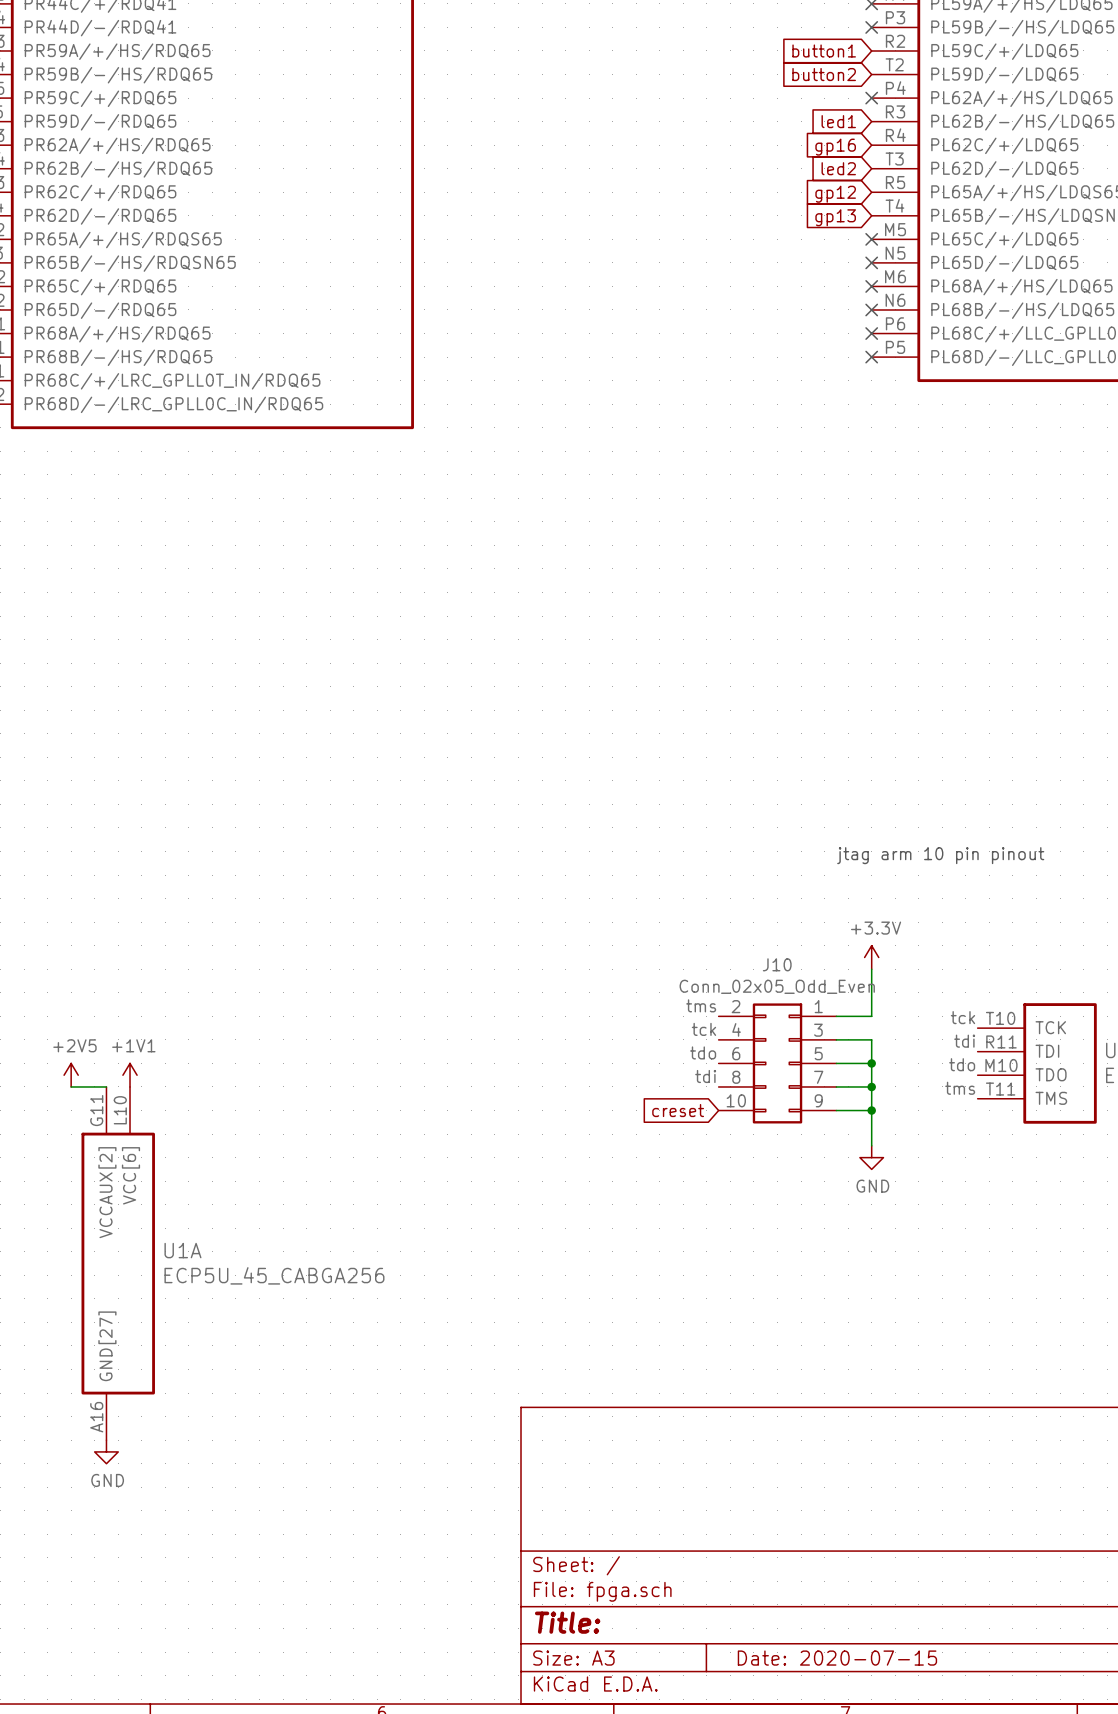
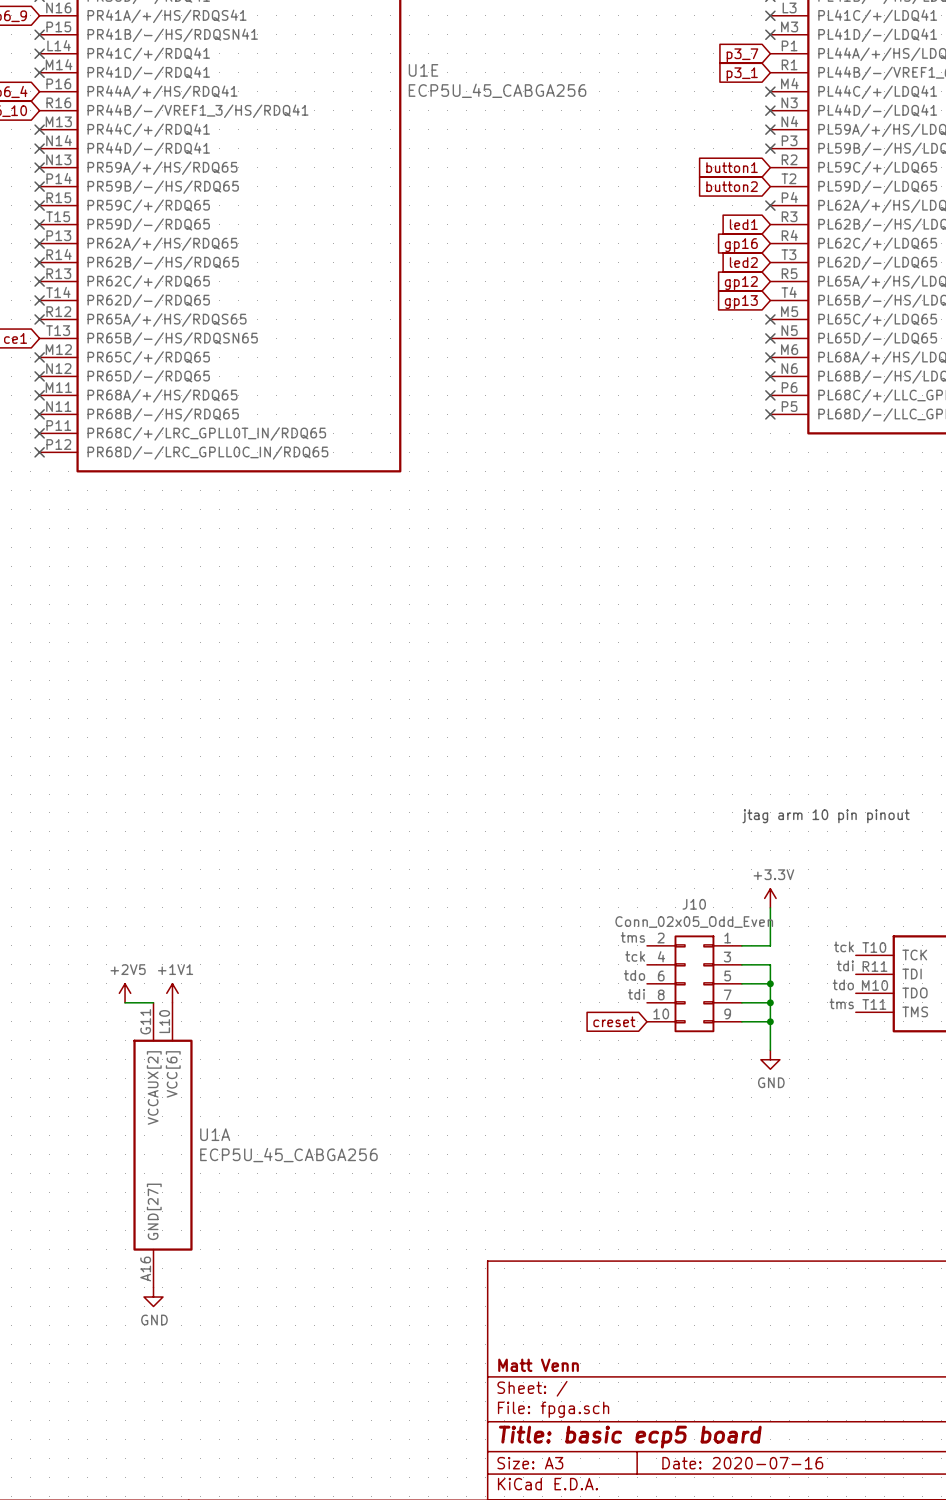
title block: none -> Matt Venn (538, 1365)
title block: Title: (567, 1622) -> Title: basic ecp5 board (630, 1437)
title block: Date: 2020-07-15 (837, 1658) -> Date: 2020-07-16 (742, 1463)

